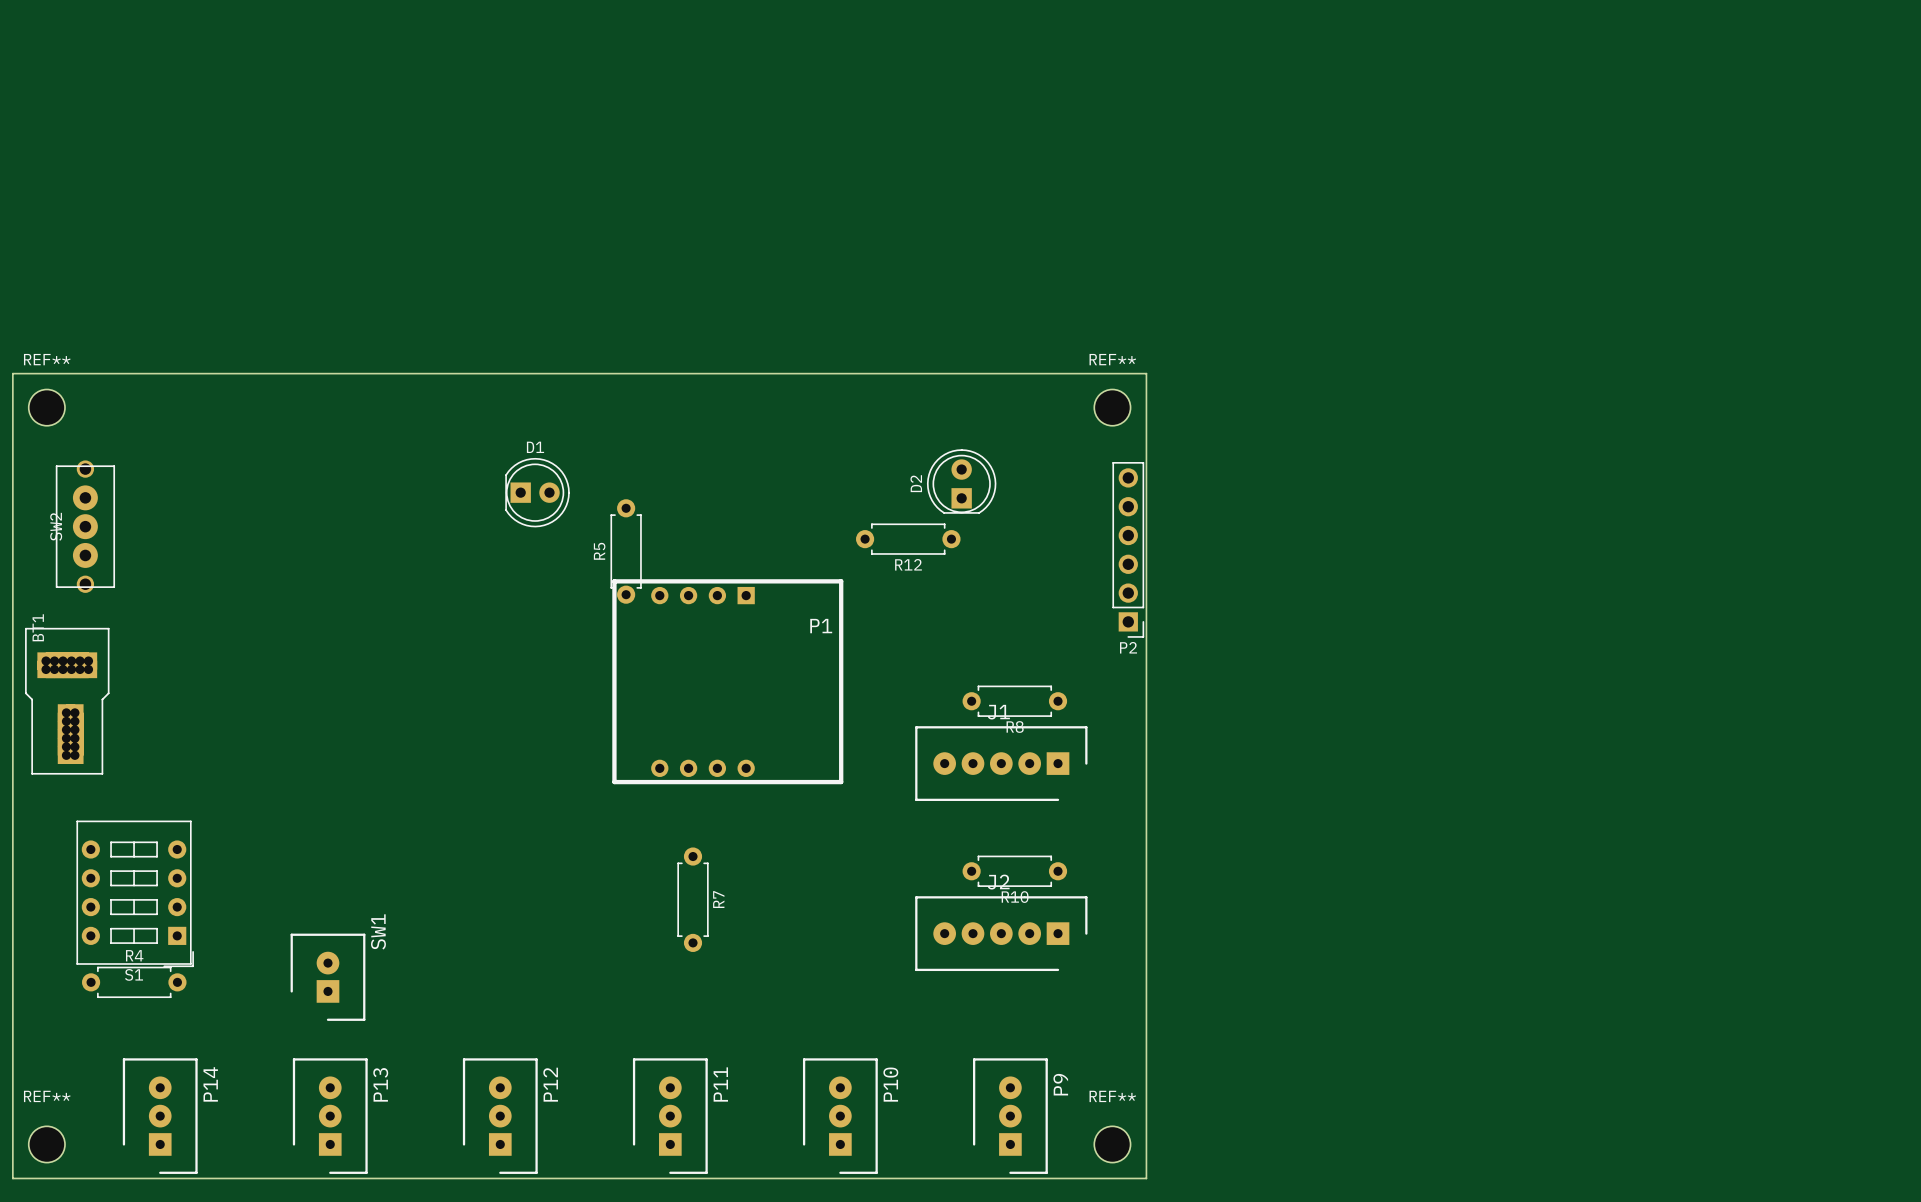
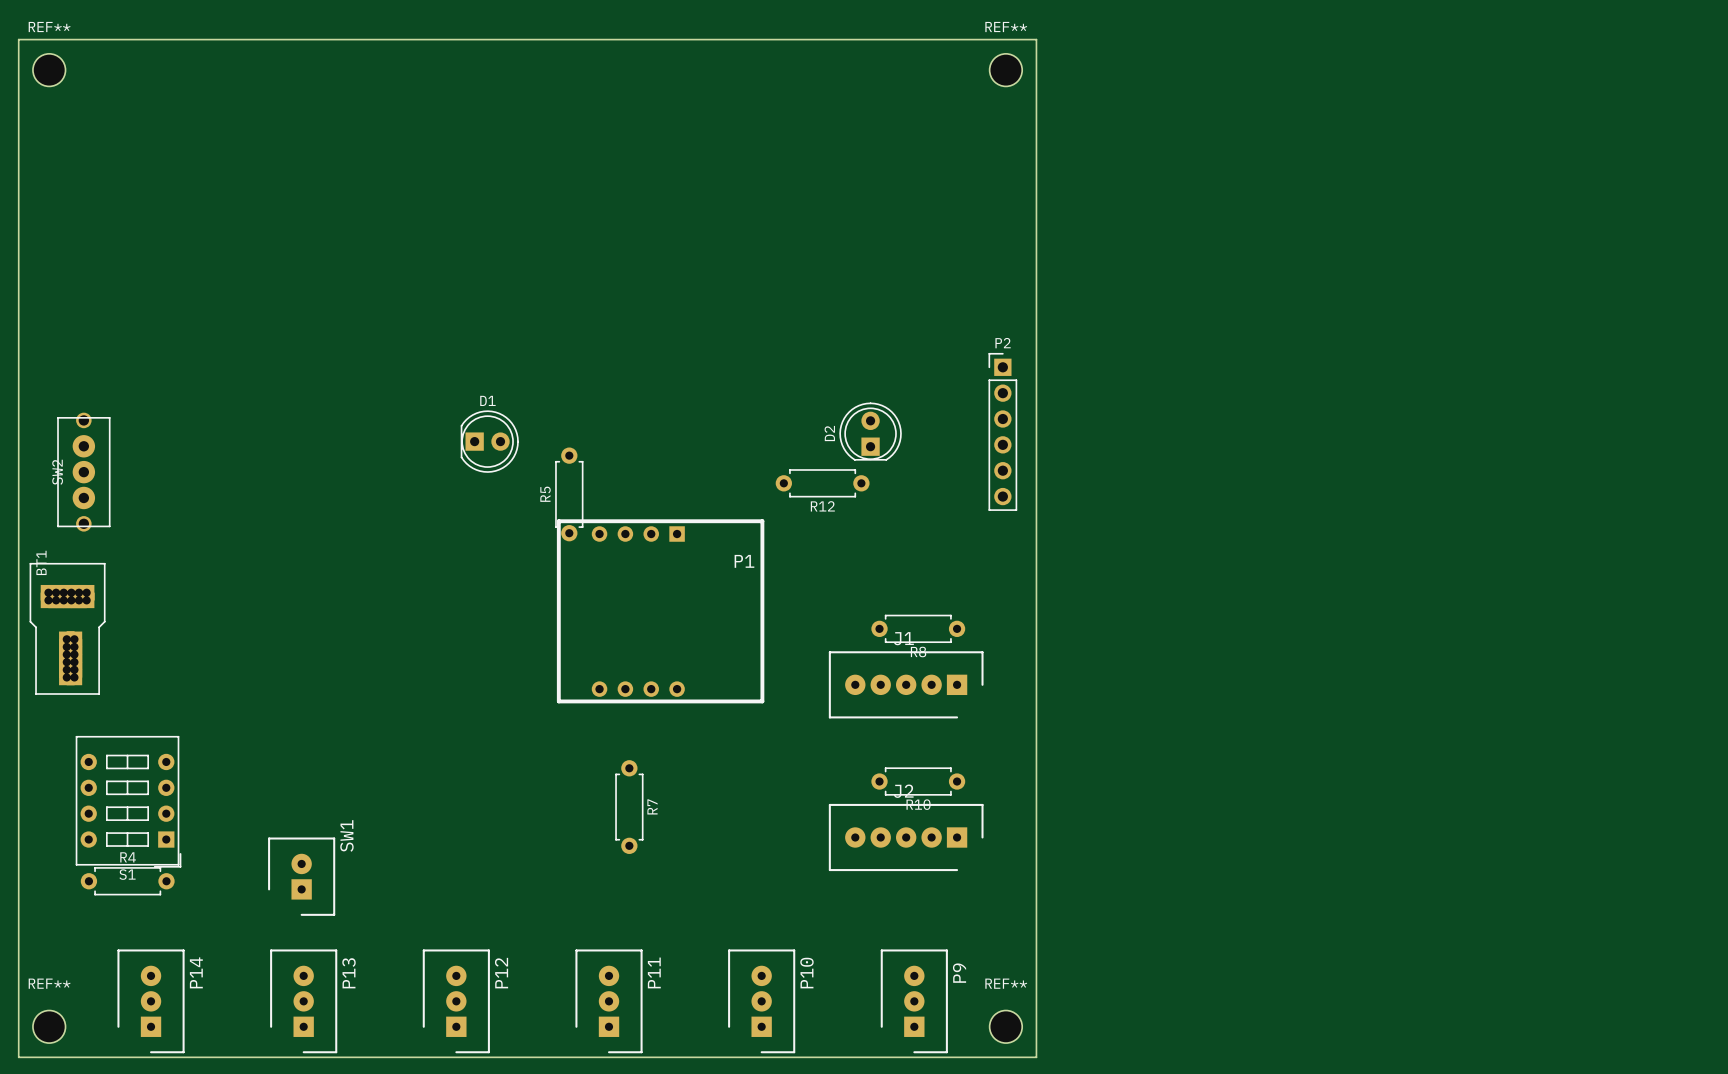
REF**: none -> (49, 70)
REF**: none -> (1005, 70)
board edge: (12, 373) (1146, 373) -> (18, 334) (18, 39) (1036, 39) (1036, 334)
REF**: (46, 407) -> none
REF**: (1112, 407) -> none
P2 rotation: 0° (1128, 549) -> 180° (1002, 431)

